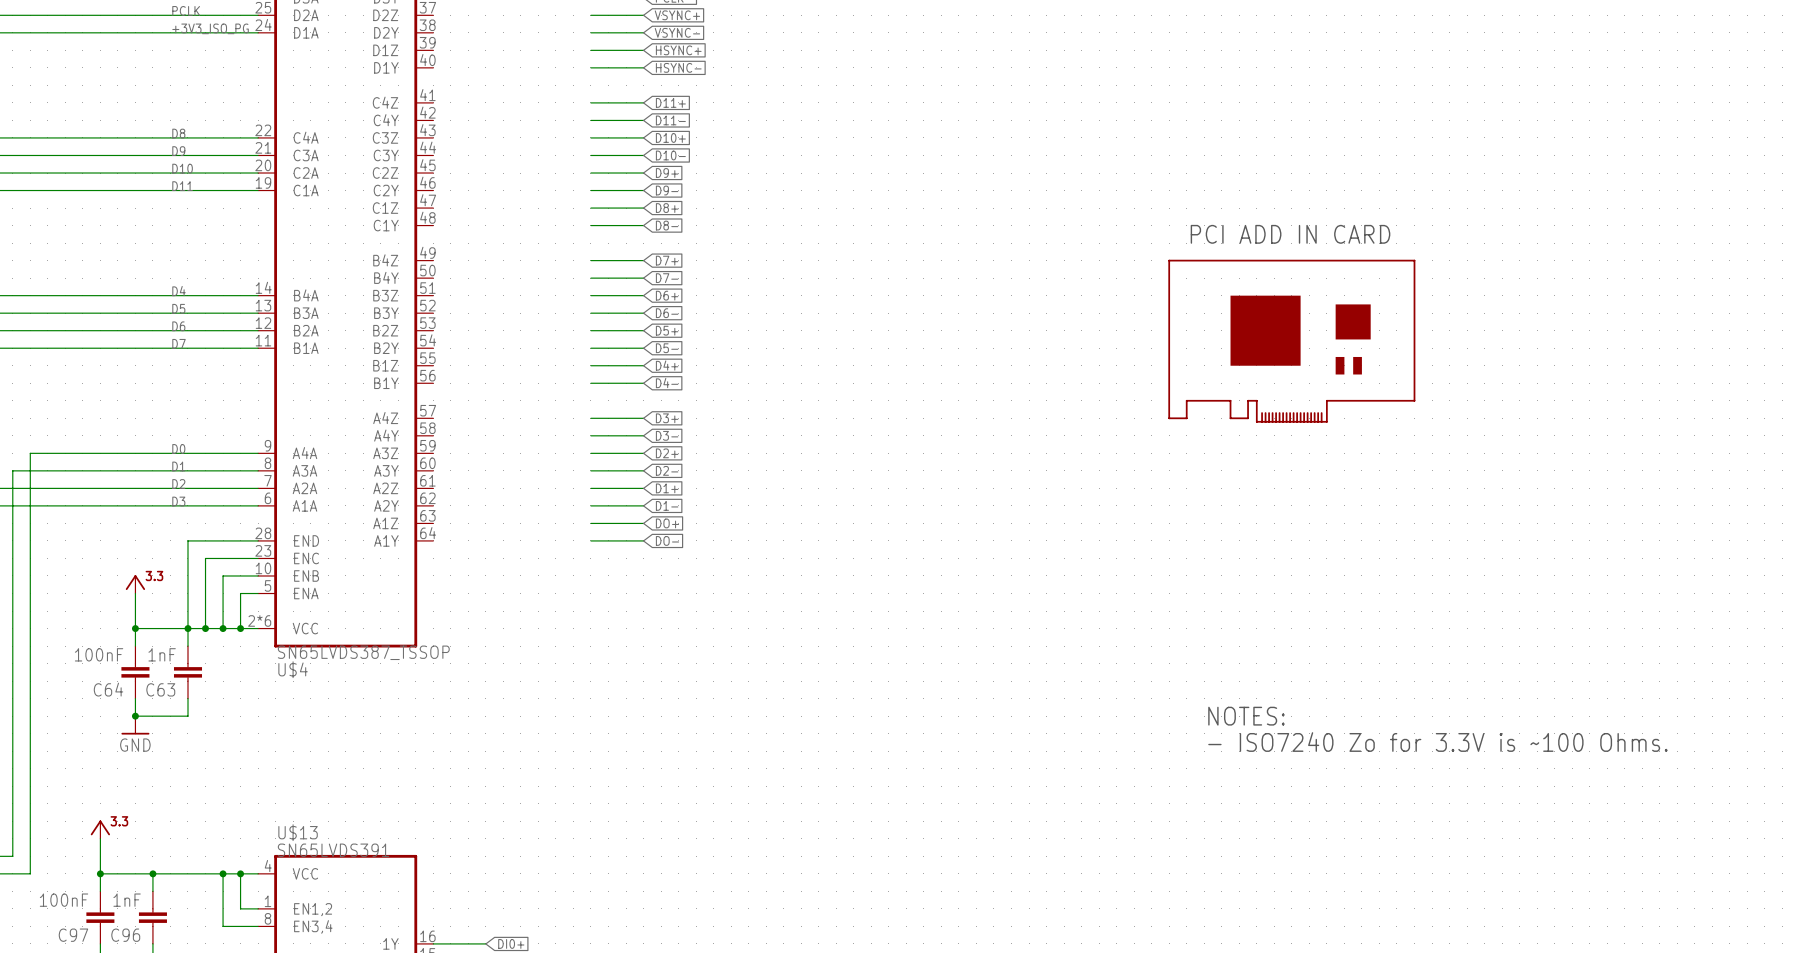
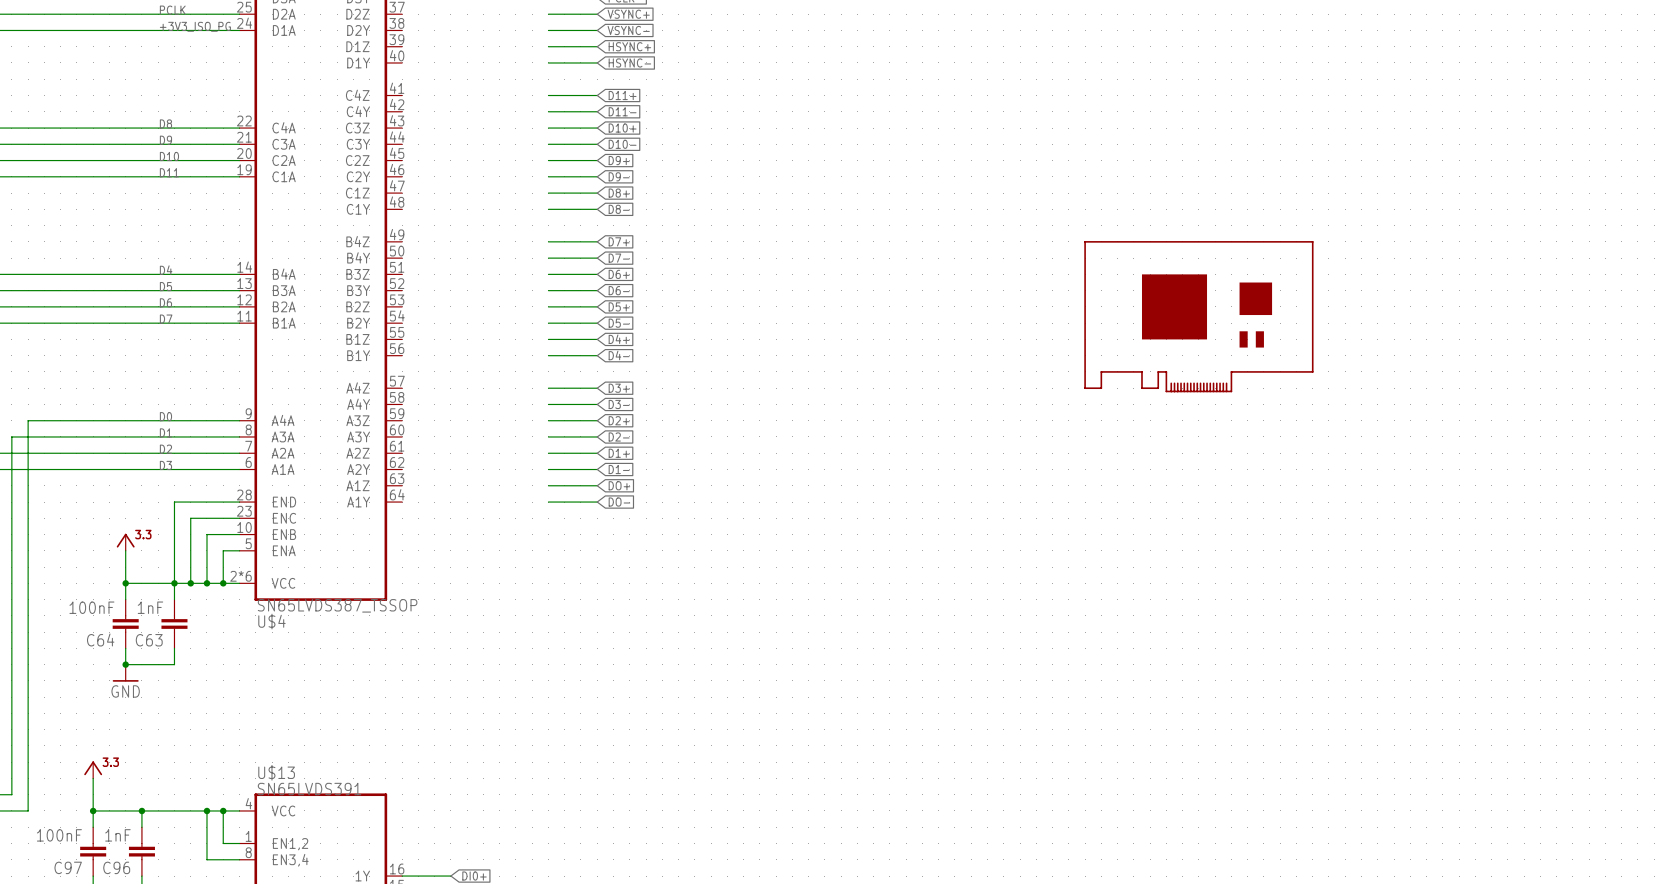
text: PCI ADD IN CARD (1290, 234) -> none
text: NOTES: (1246, 716) -> none
text: - ISO7240 Zo for 3.3V is ~100 Ohms. (1437, 742) -> none

